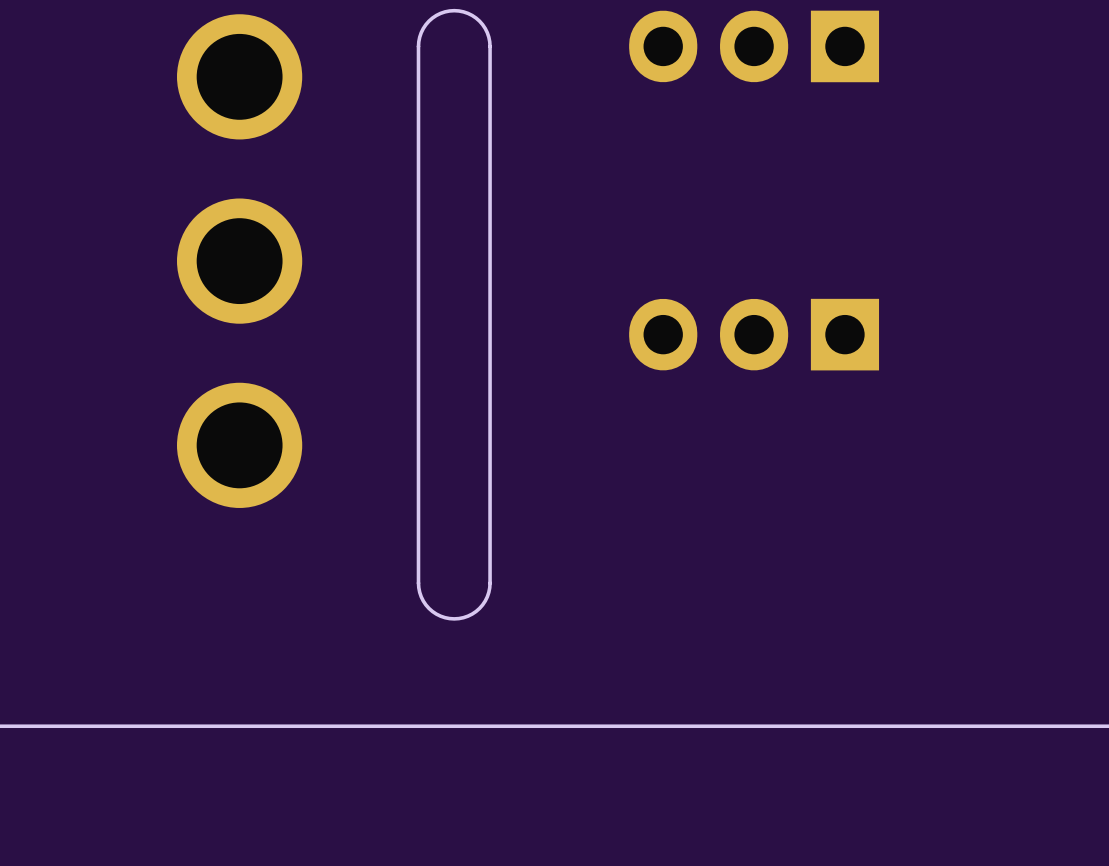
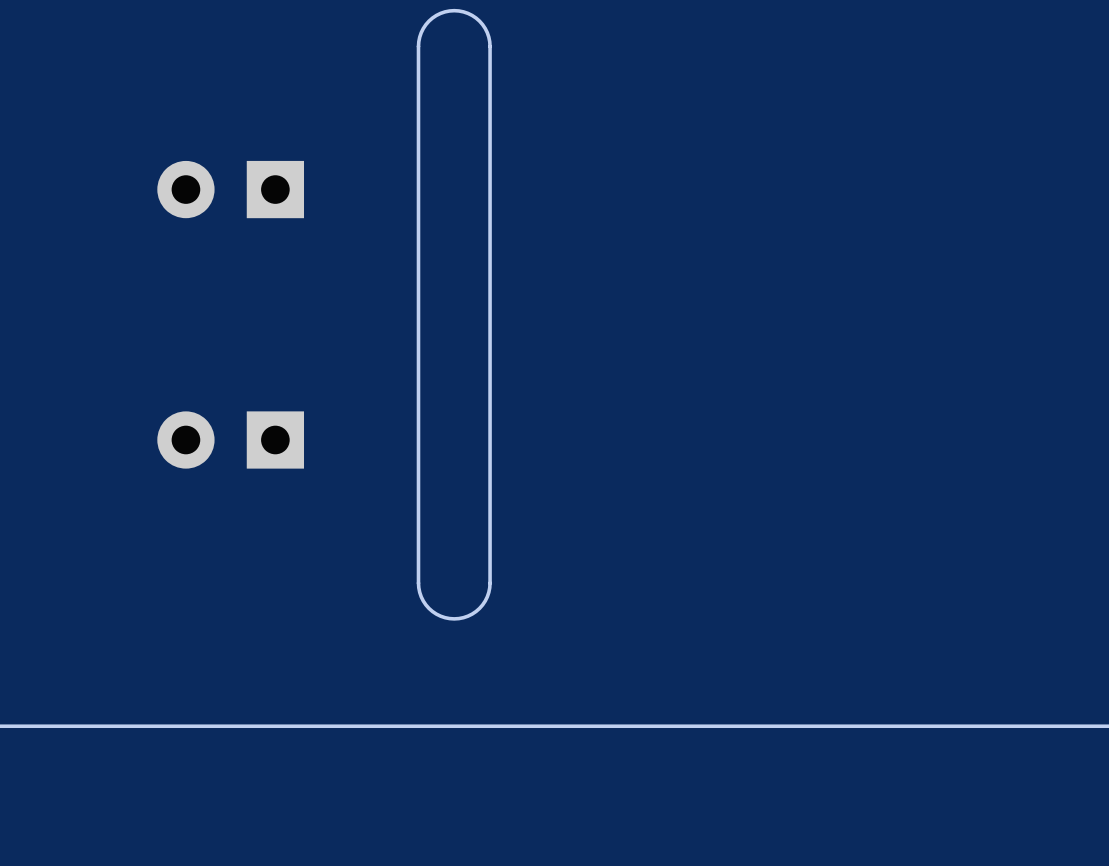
part: (754, 46) -> none
part: none -> (230, 189)
part: (239, 261) -> none
part: (754, 334) -> none
part: none -> (230, 440)

